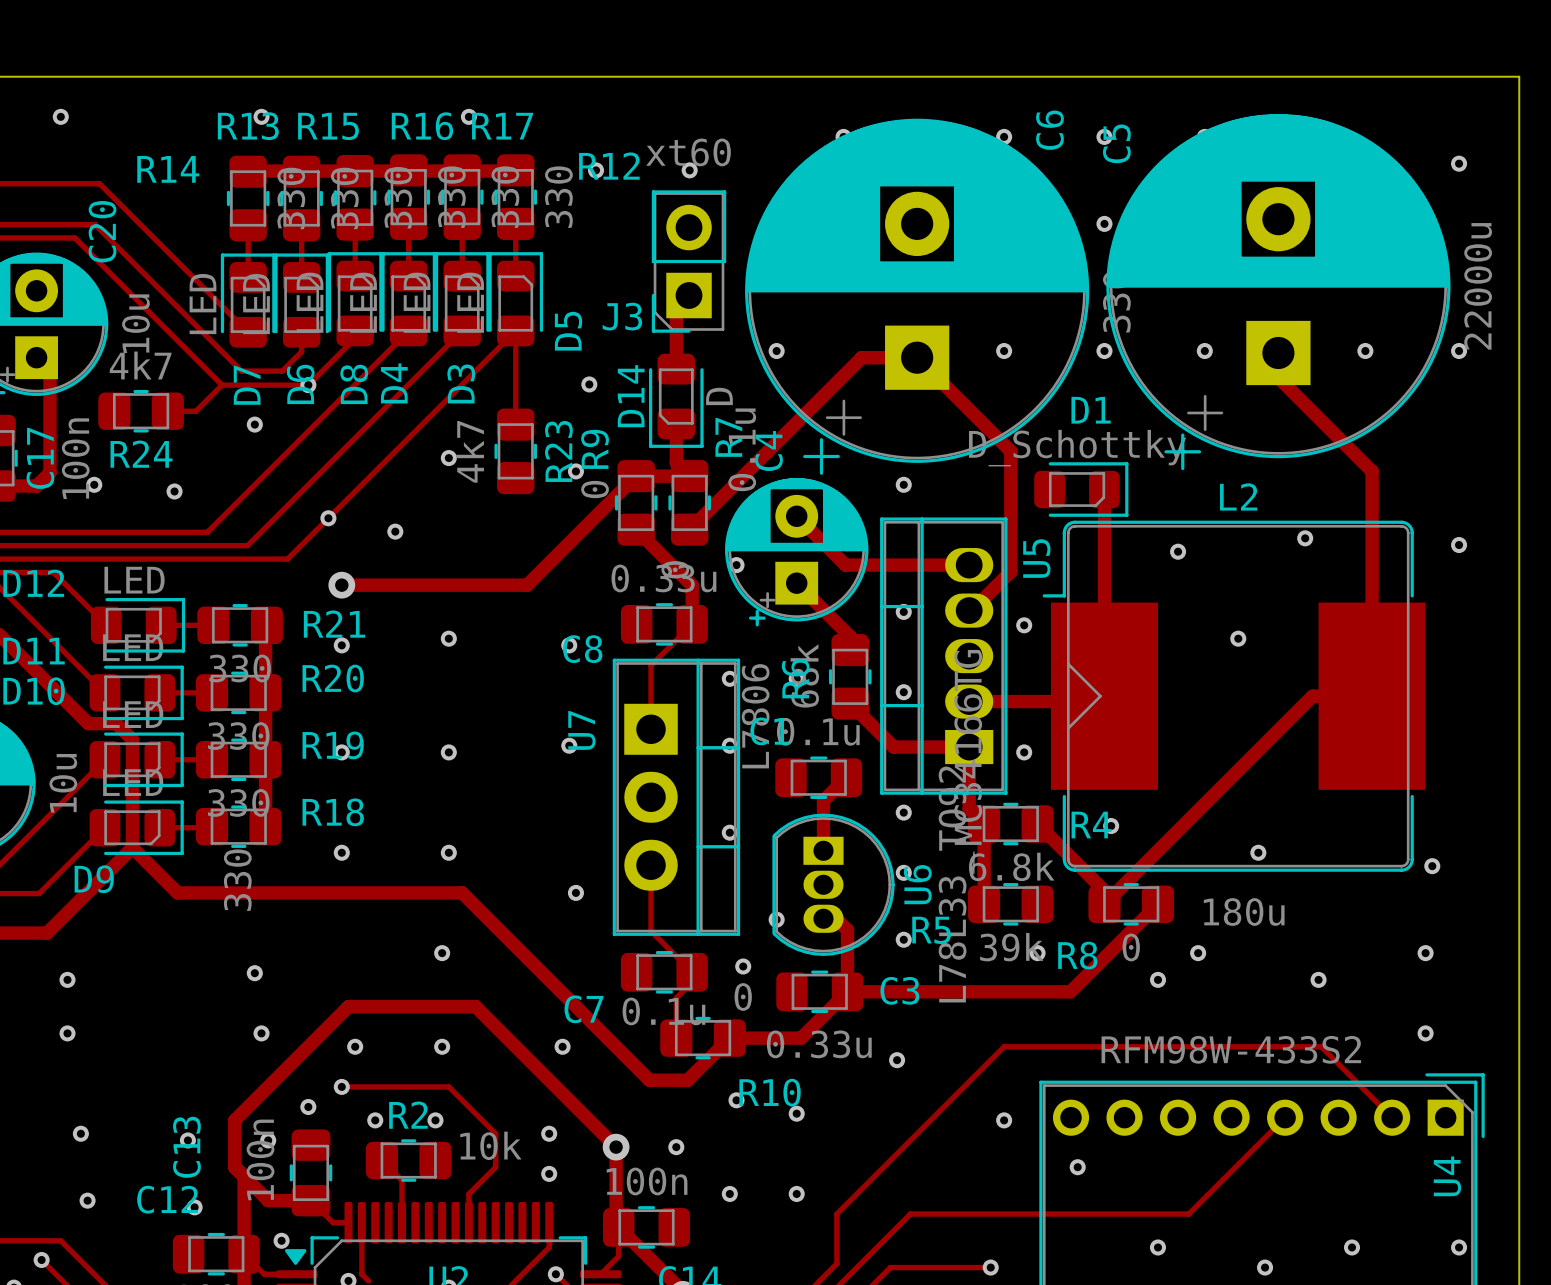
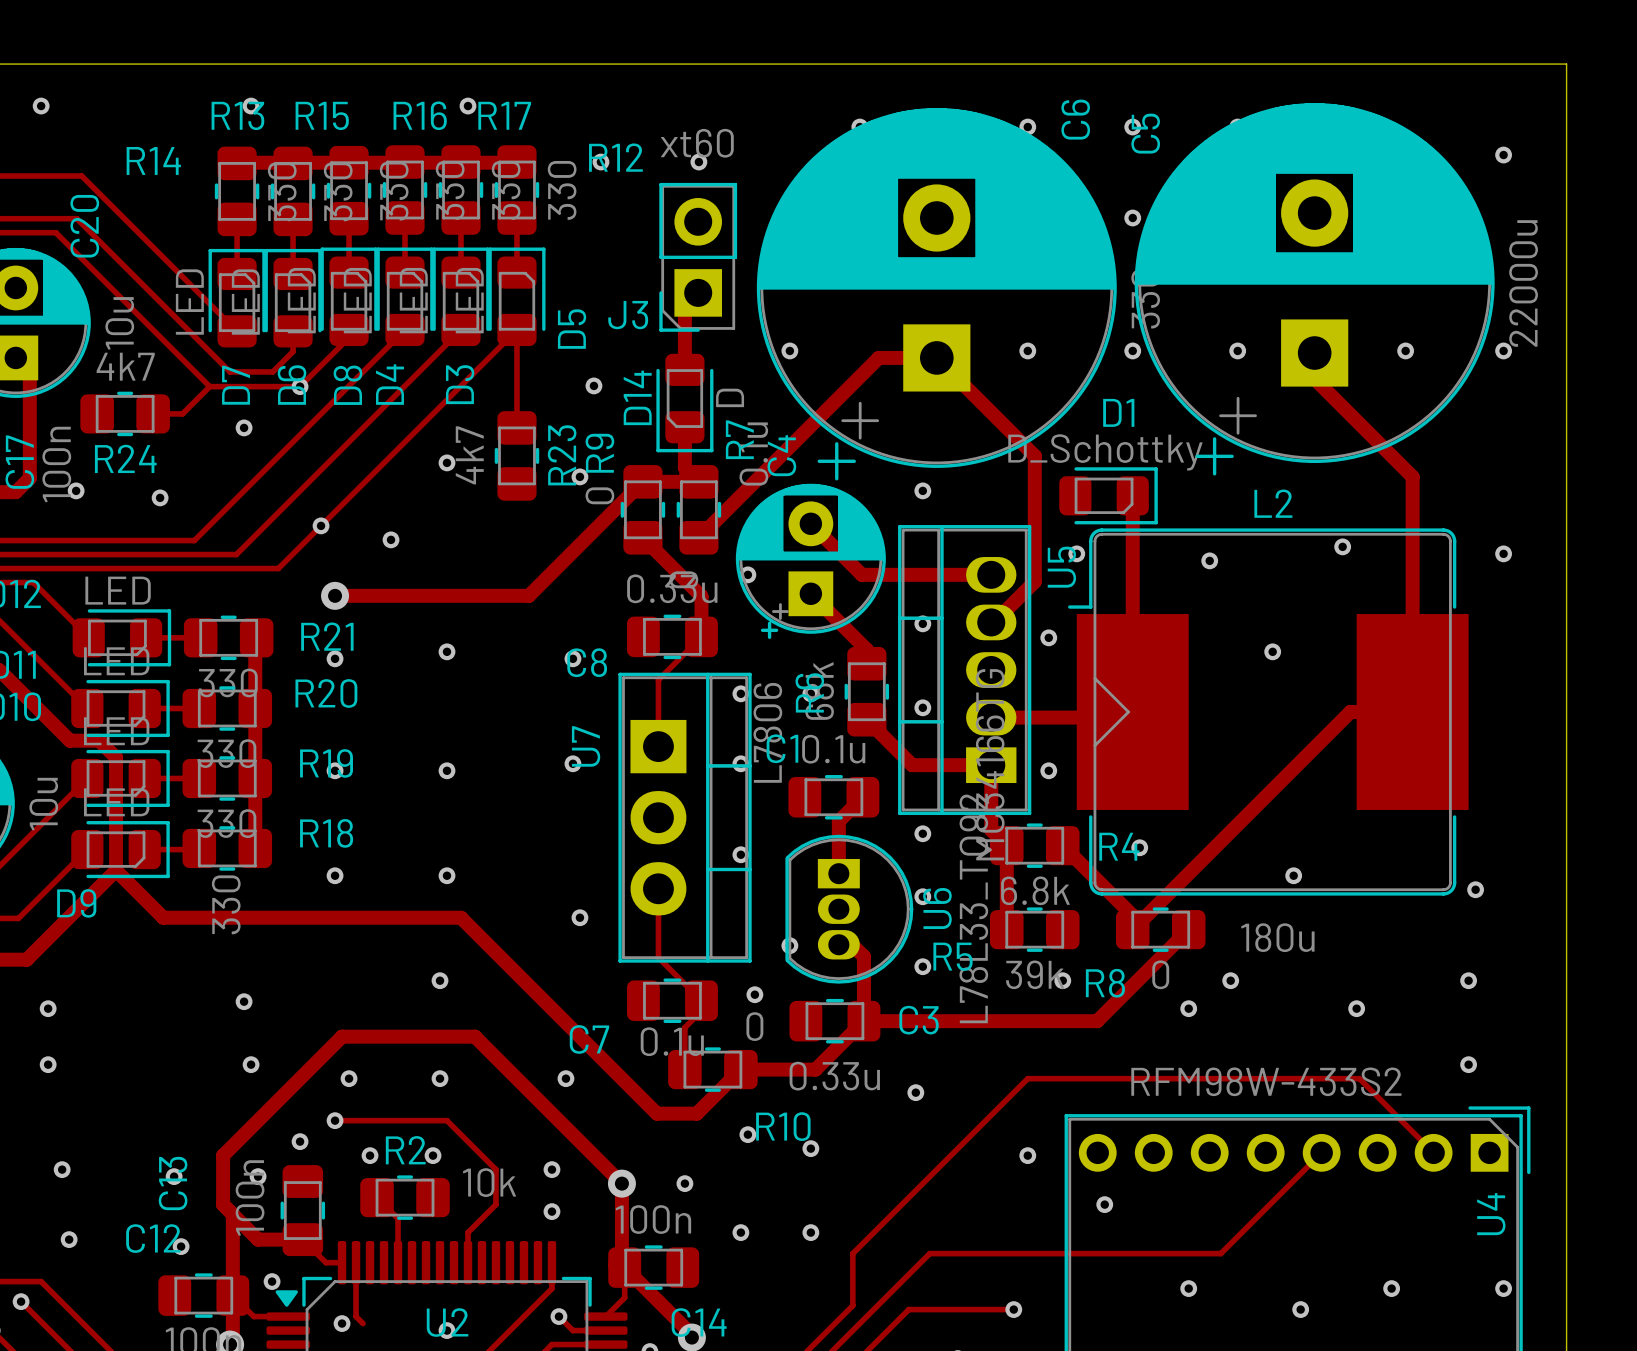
via: none -> (1076, 553)

